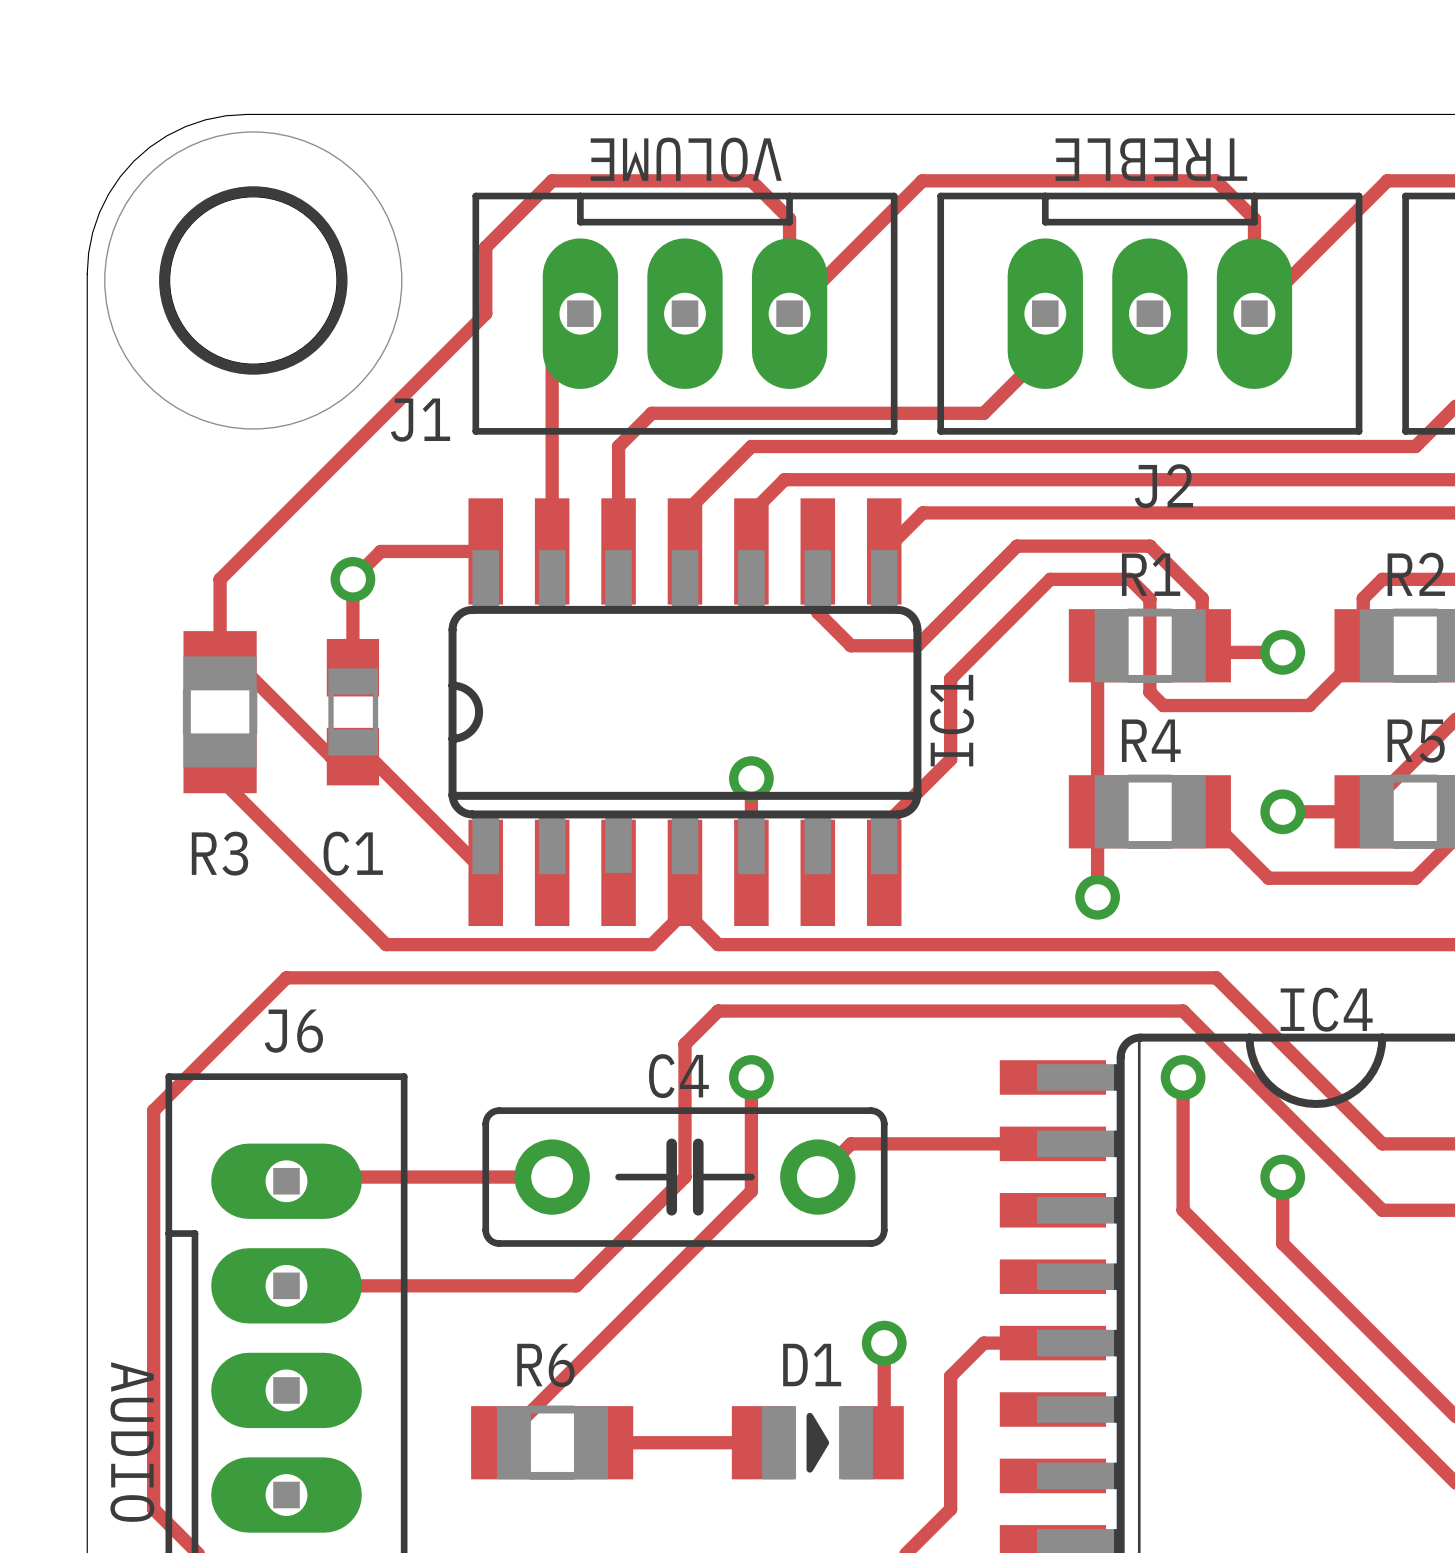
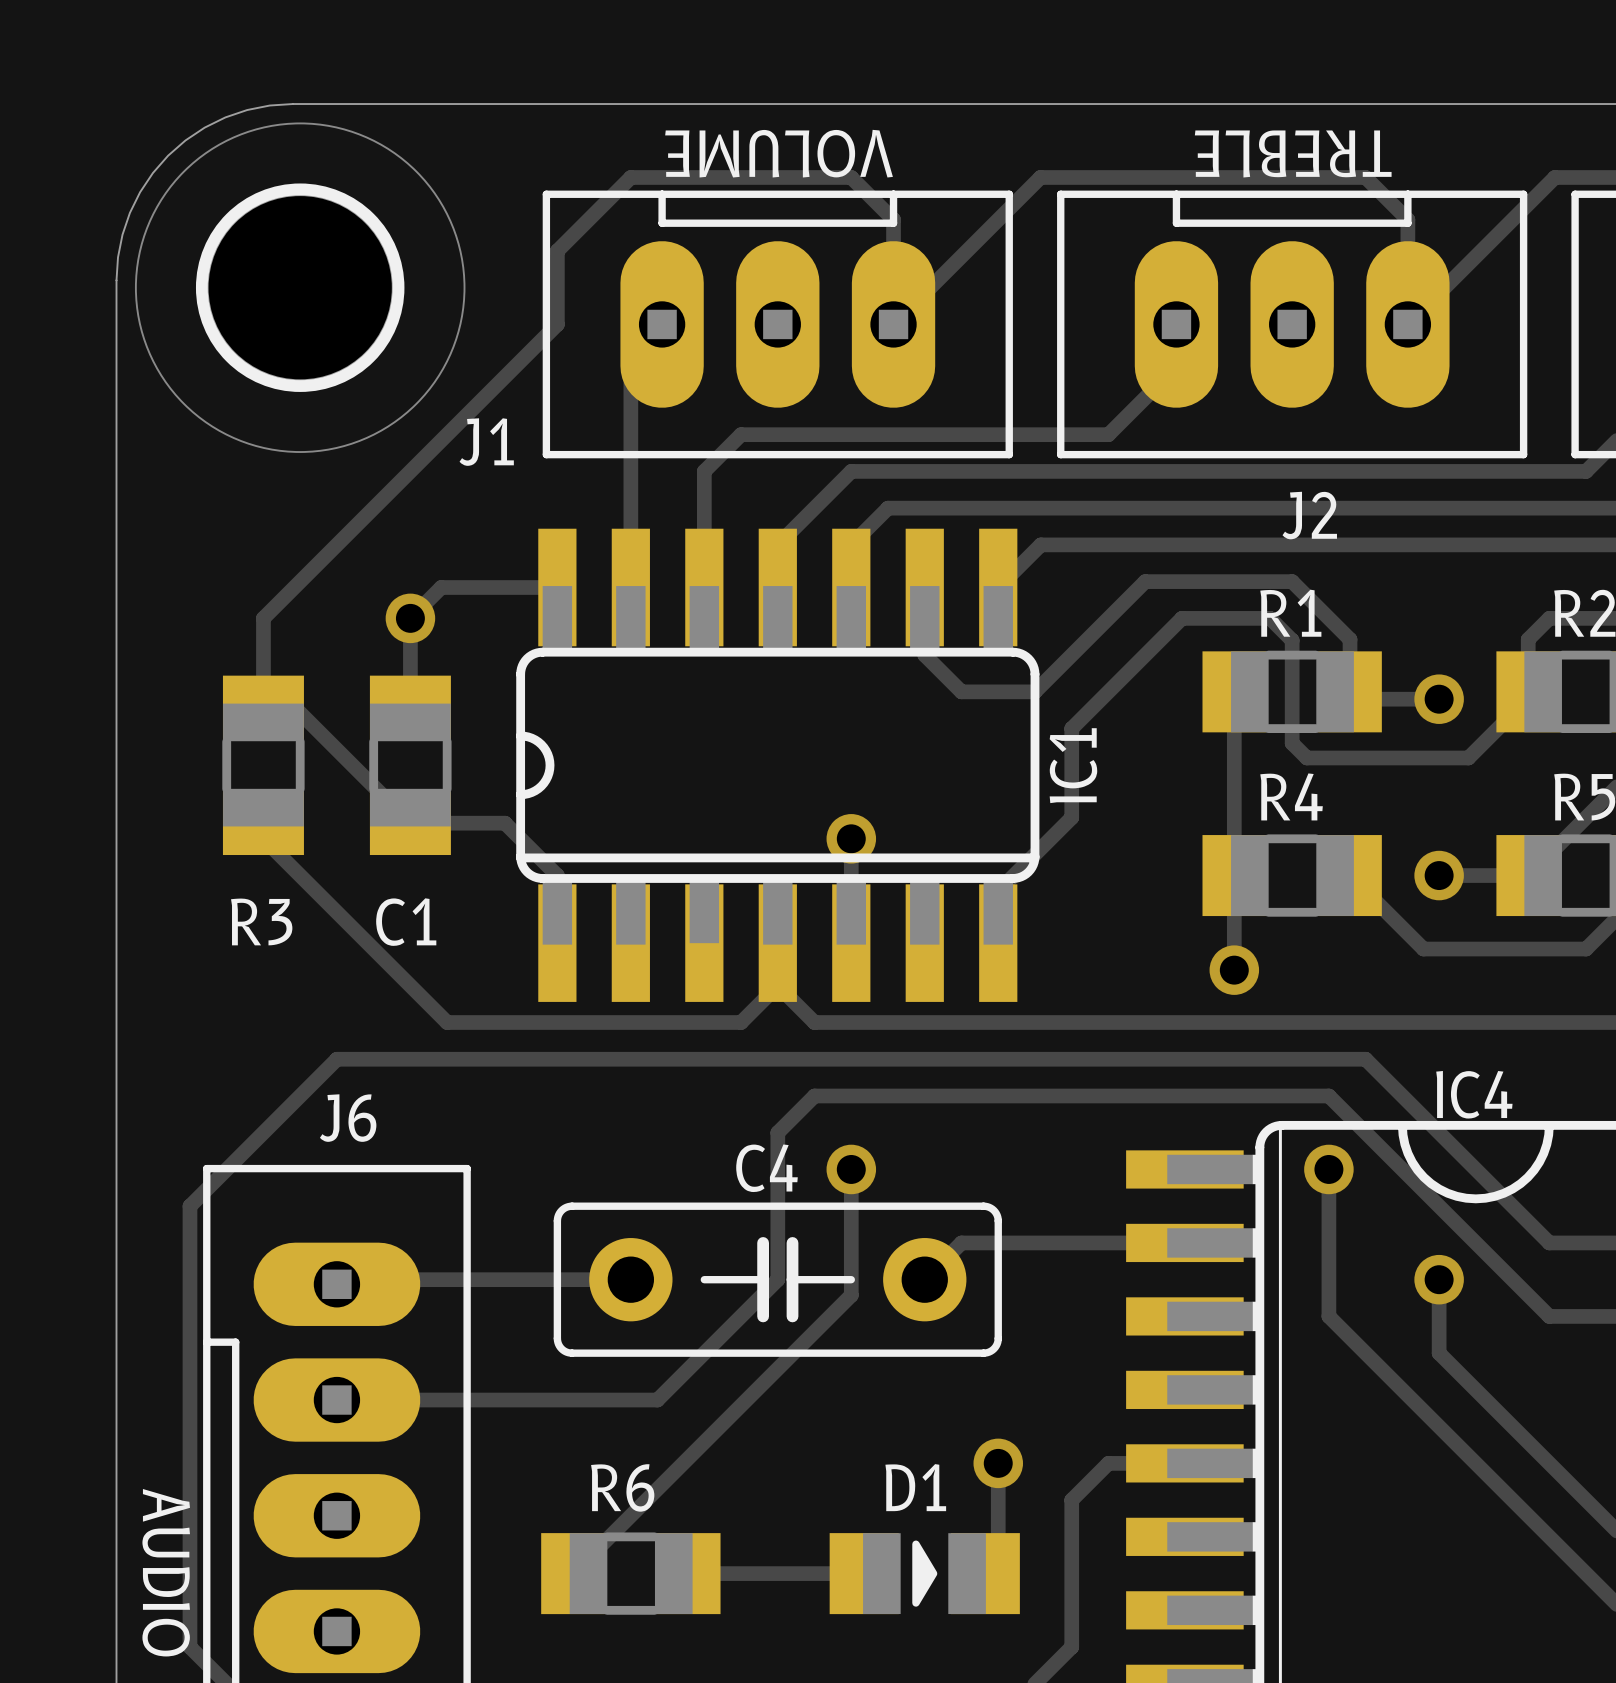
C1 footprint: [326, 638, 380, 786] -> [369, 675, 452, 856]
track: (220, 645) (330, 756) (369, 756) (485, 872) -> (263, 707) (294, 707) (410, 823) (505, 823) (557, 875) (557, 943)

